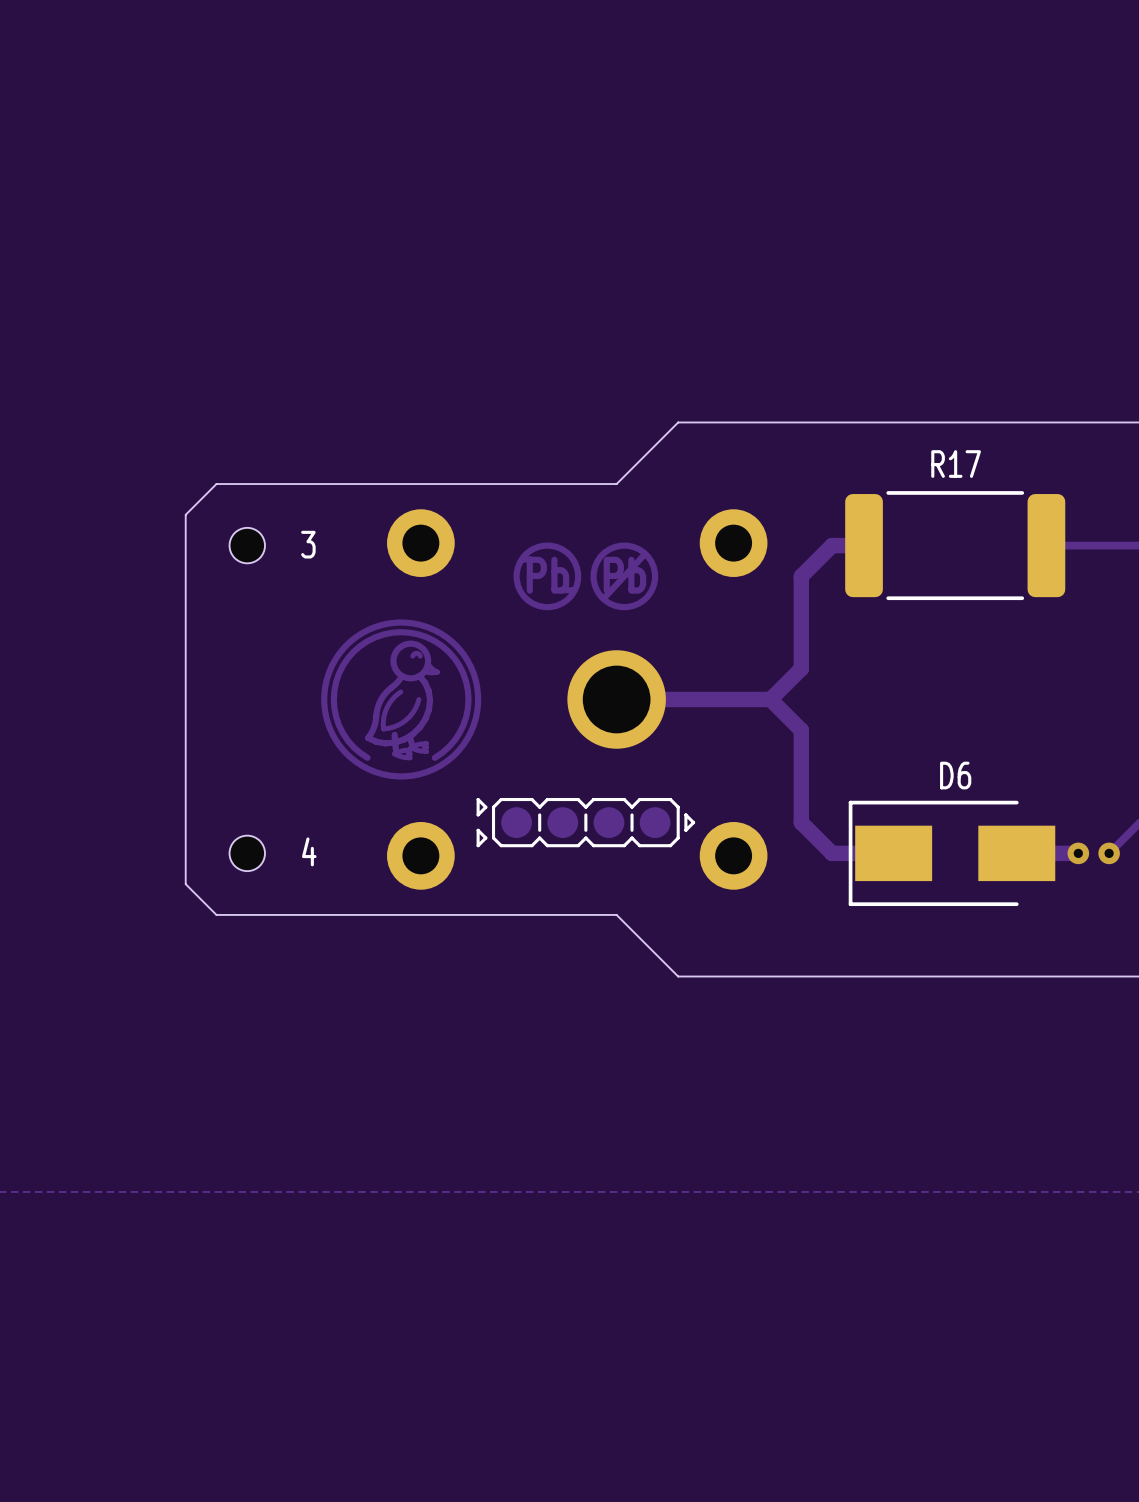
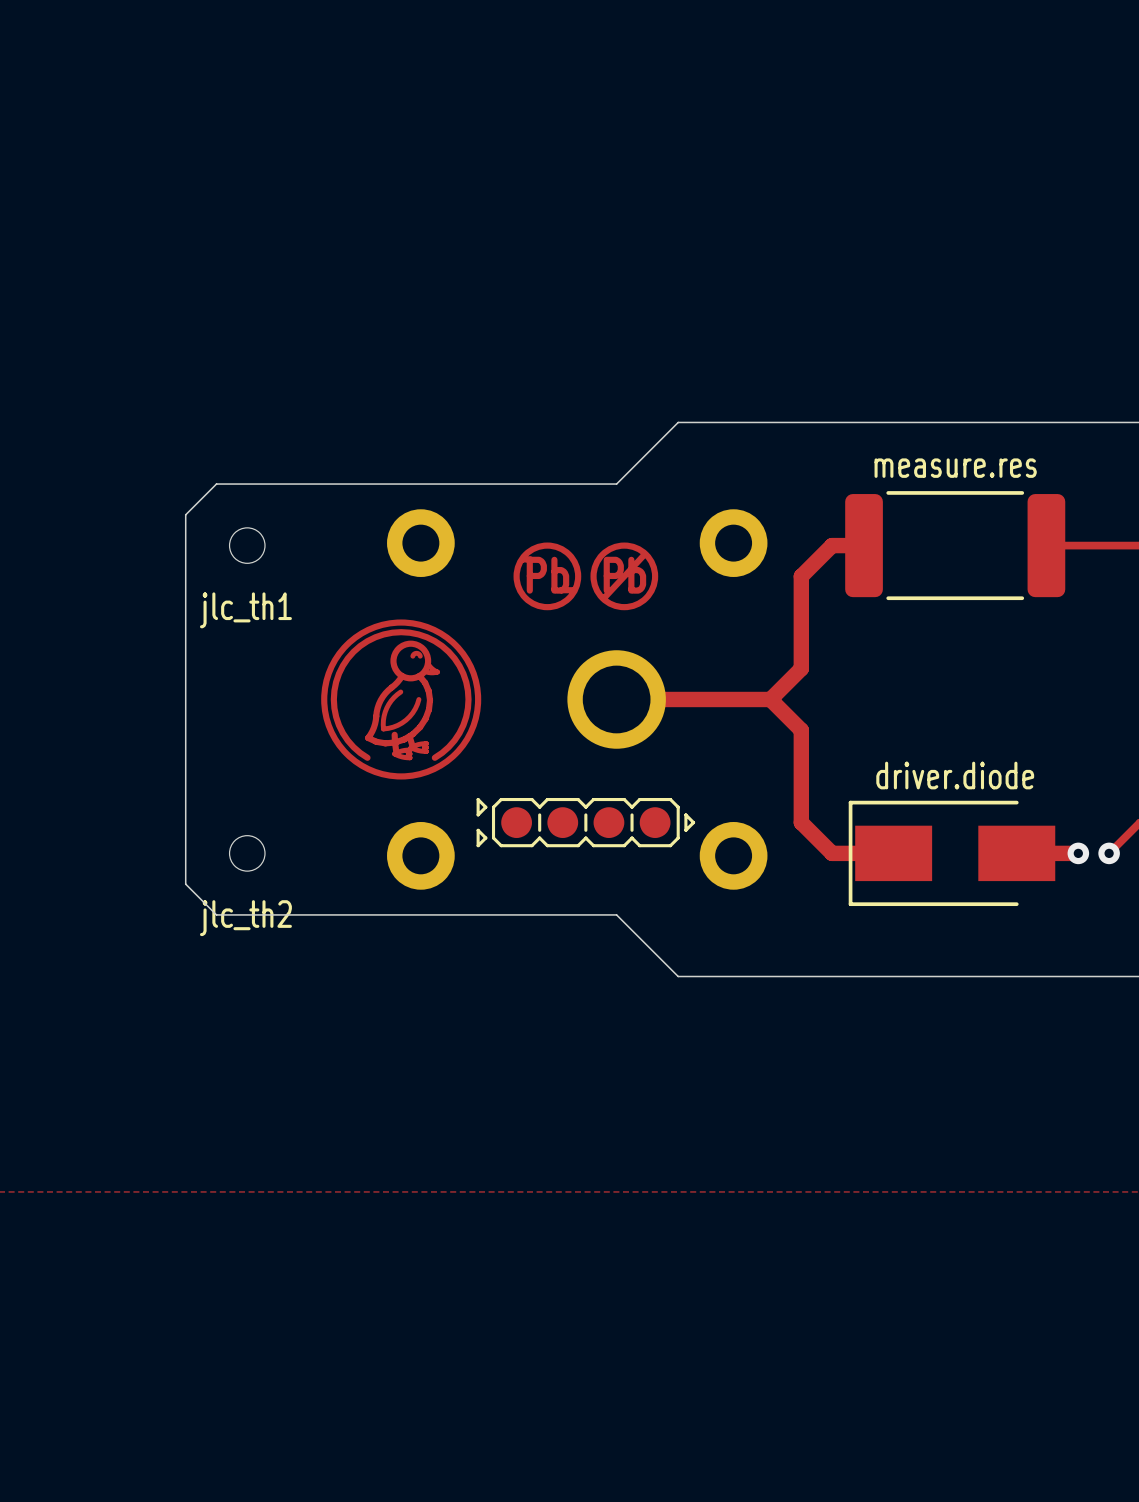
R17 name: R17 (956, 464) -> measure.res (955, 468)
3 name: 3 (308, 544) -> jlc_th1 (245, 610)
D6 name: D6 (955, 775) -> driver.diode (955, 775)
4 name: 4 (309, 851) -> jlc_th2 (245, 918)

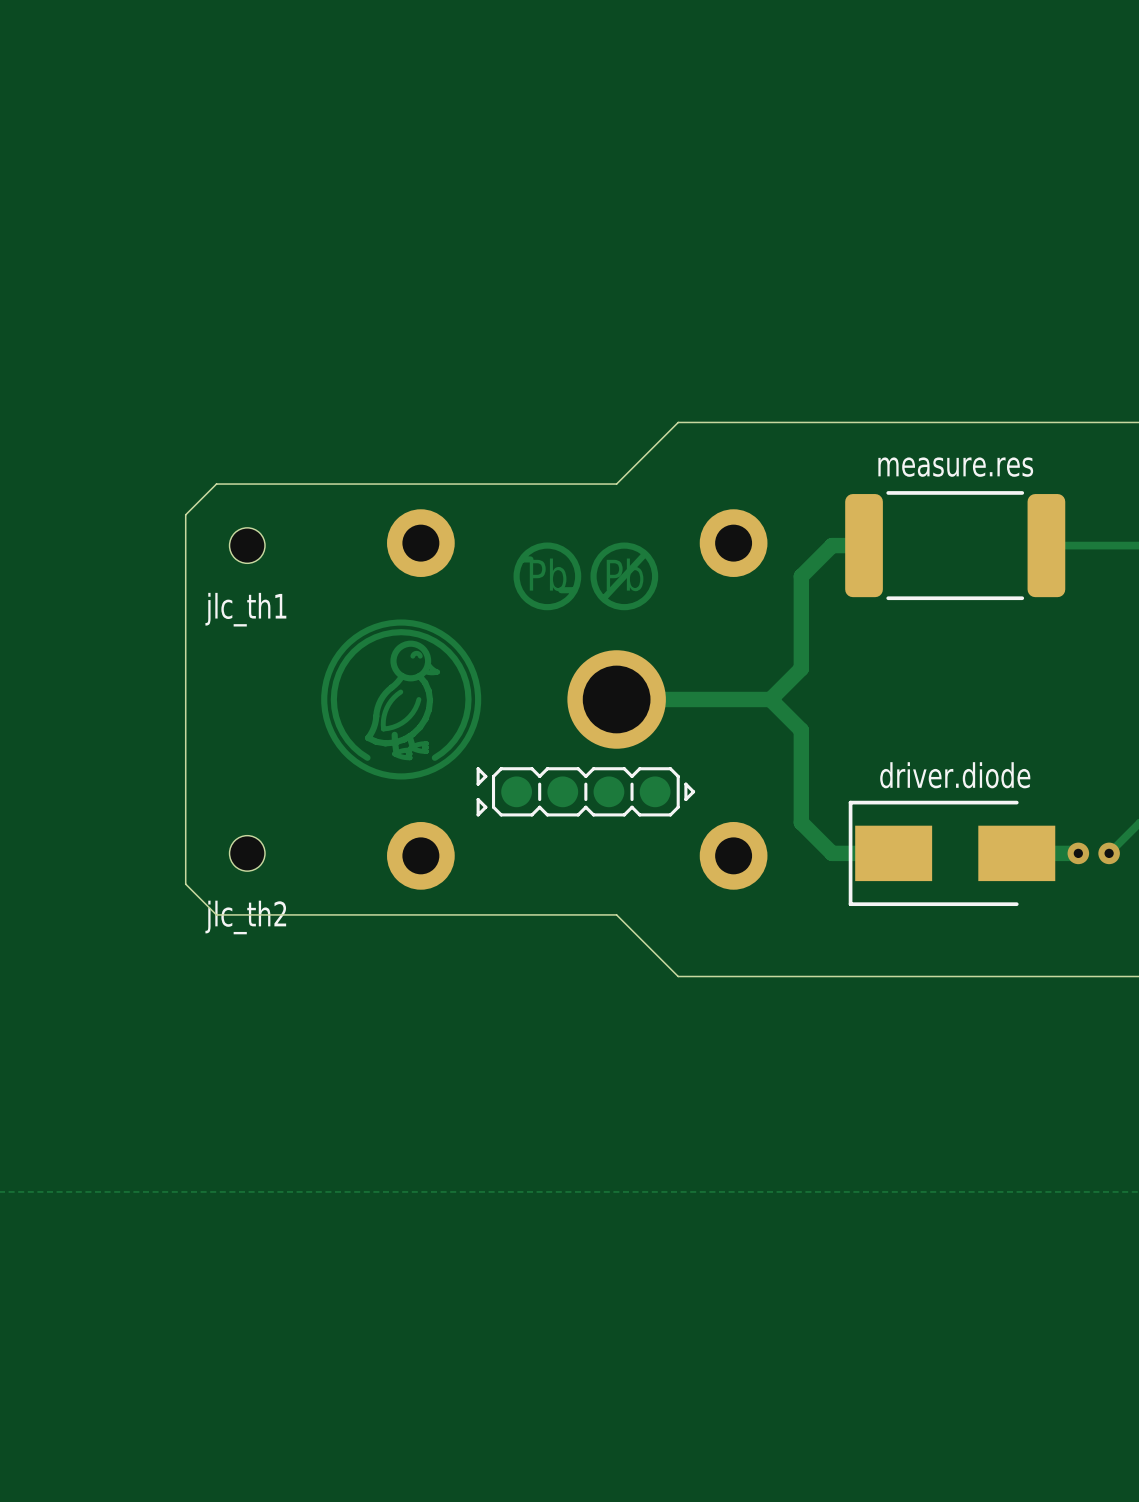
drawing position: (585, 822) -> (585, 791)

